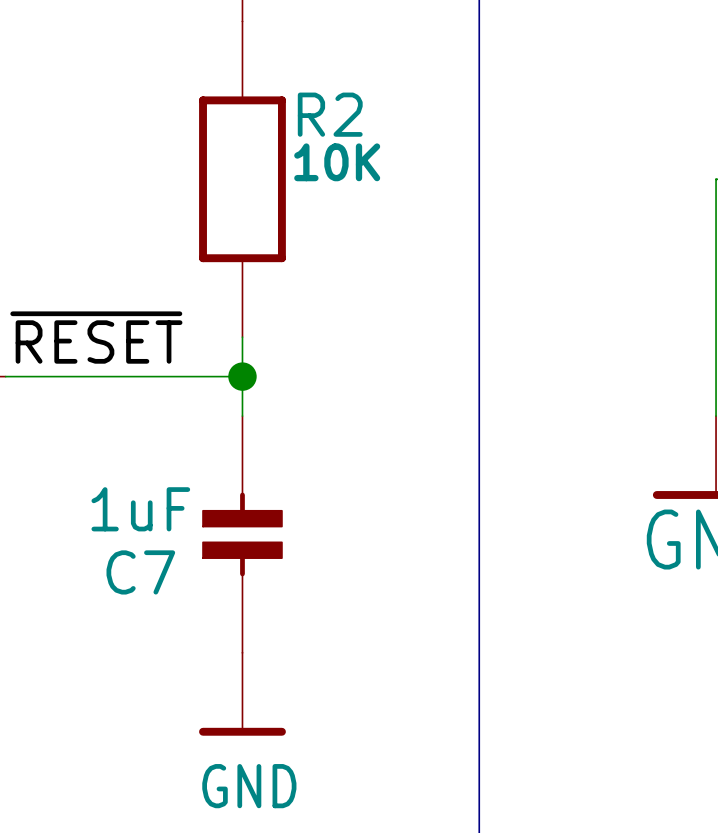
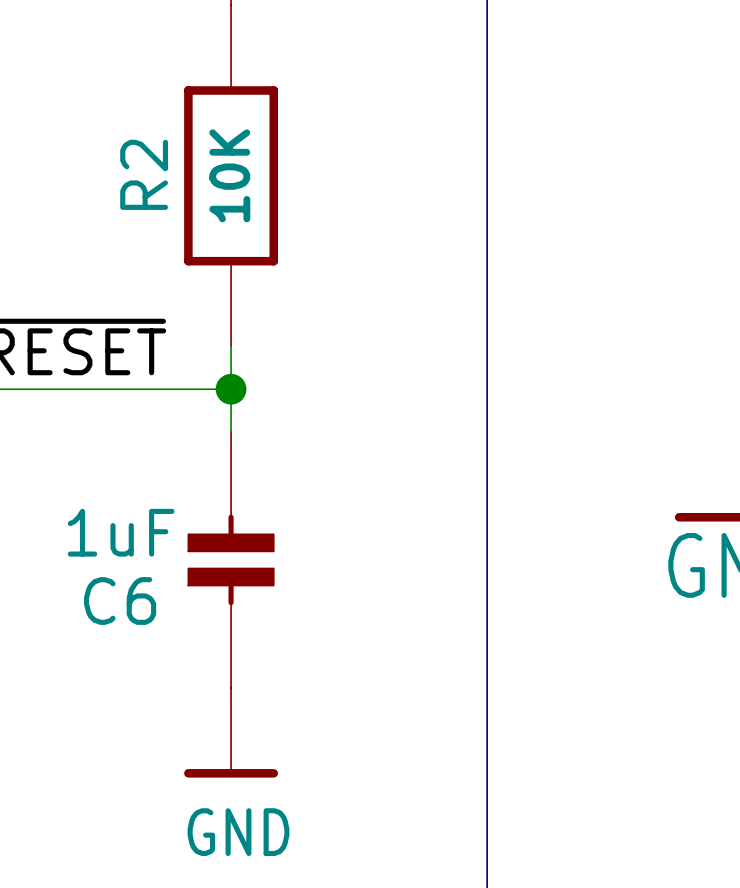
R2 name rotation: 0° (330, 114) -> 90° counterclockwise (144, 174)
R2 name position: R2 (330, 114) -> R2 (144, 174)
R2 value rotation: 0° (337, 162) -> 90° counterclockwise (229, 175)
C7 name: C7 (140, 572) -> C6 (120, 601)

